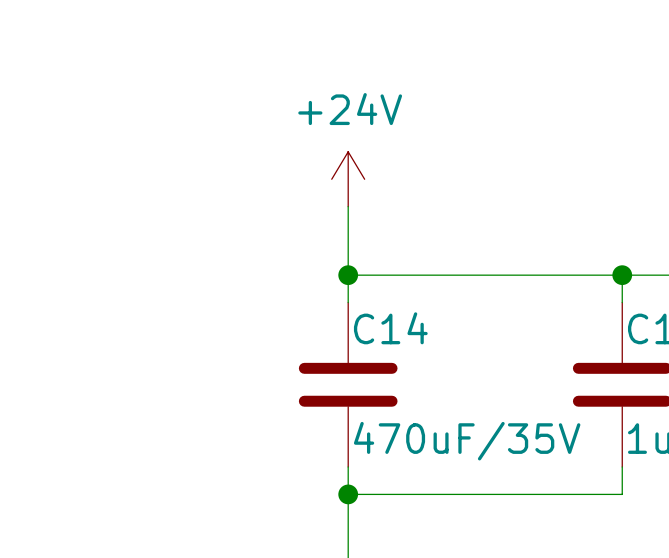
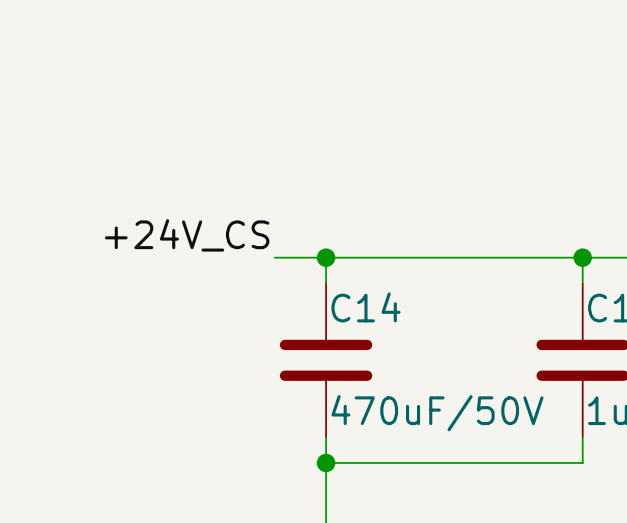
power symbol: +24V (348, 179) -> none
wire: (348, 206) (348, 275) -> (274, 257) (326, 257)
label: none -> +24V_CS (187, 235)
C14 value: 470uF/35V (467, 441) -> 470uF/50V (437, 413)

